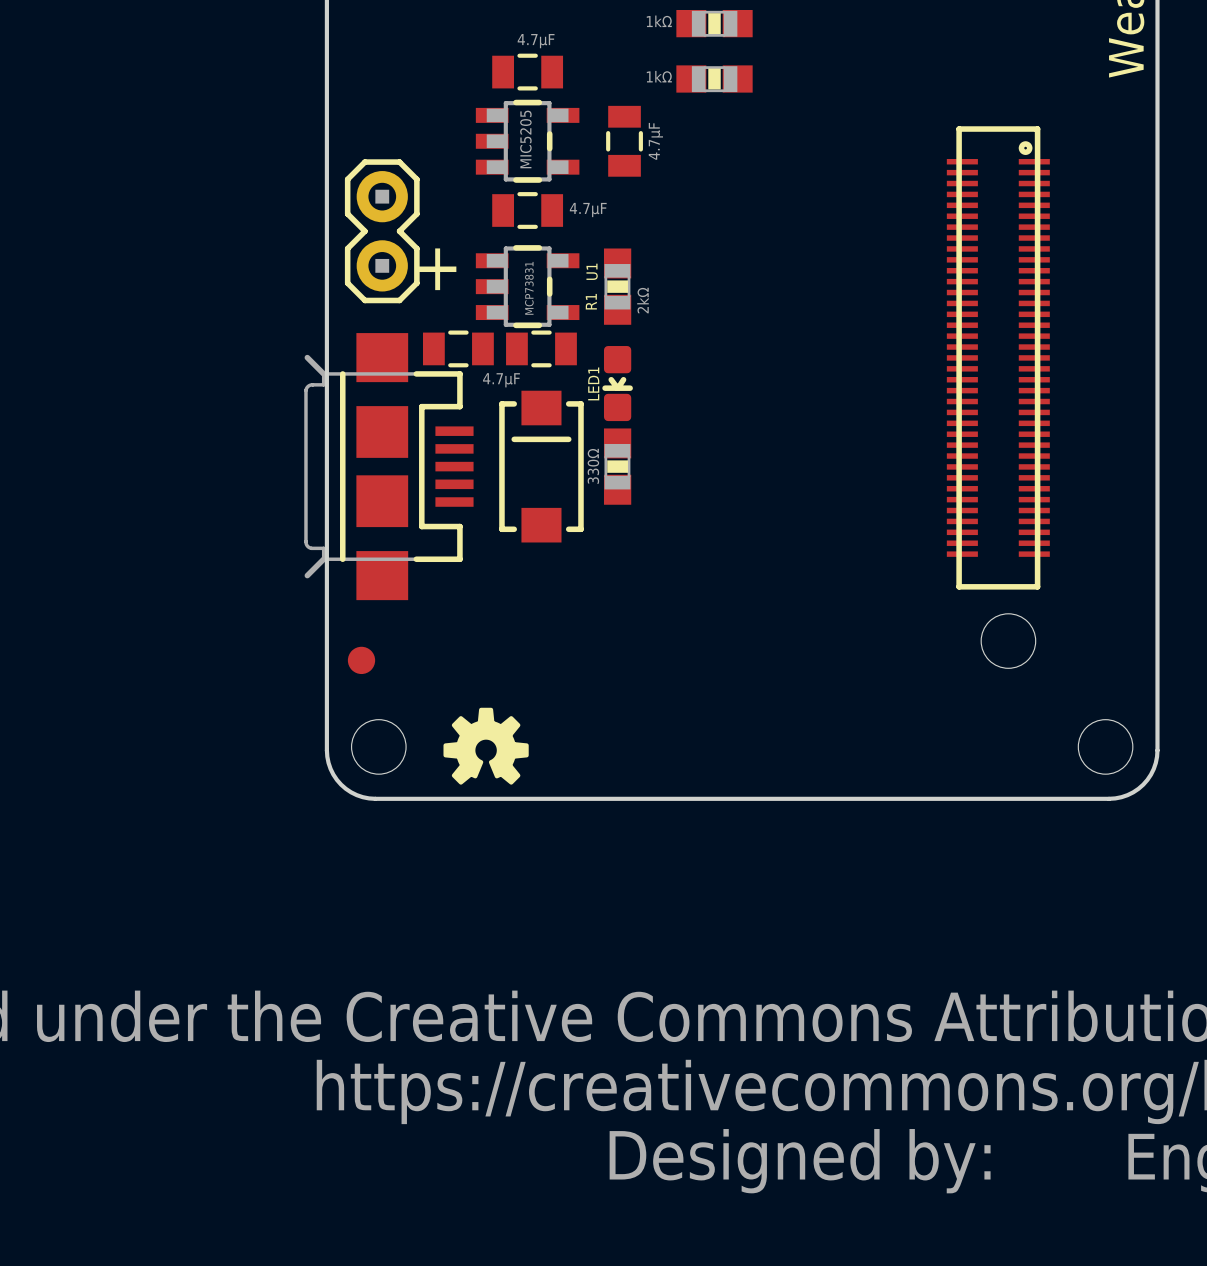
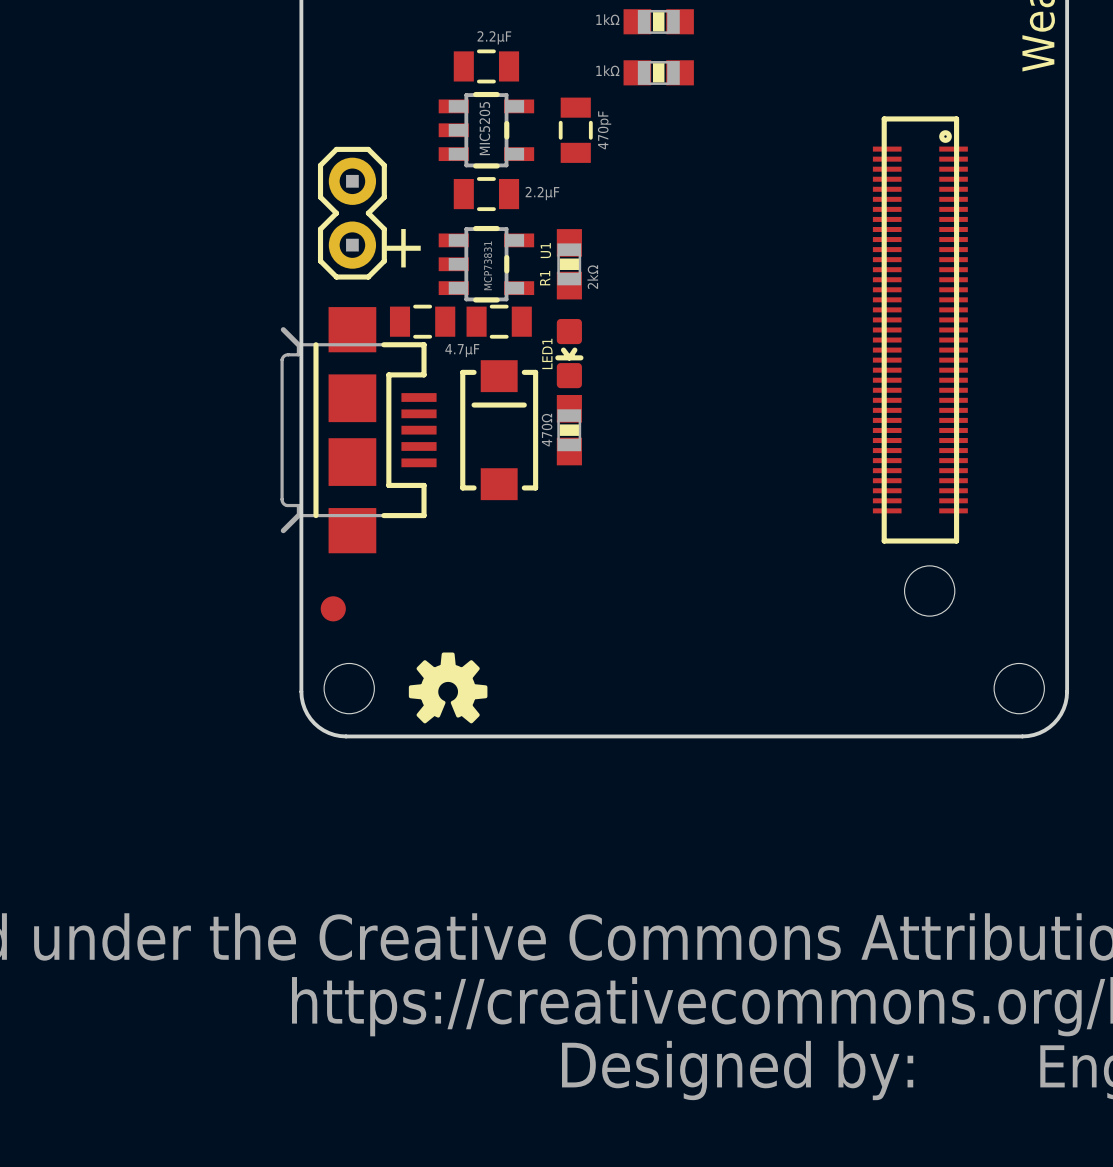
part value: 4.7µF (536, 41) -> 2.2µF (494, 37)
part value: 4.7µF (655, 141) -> 470pF (604, 130)
part value: 4.7µF (588, 210) -> 2.2µF (542, 193)
part value: 330Ω (593, 466) -> 470Ω (547, 430)

